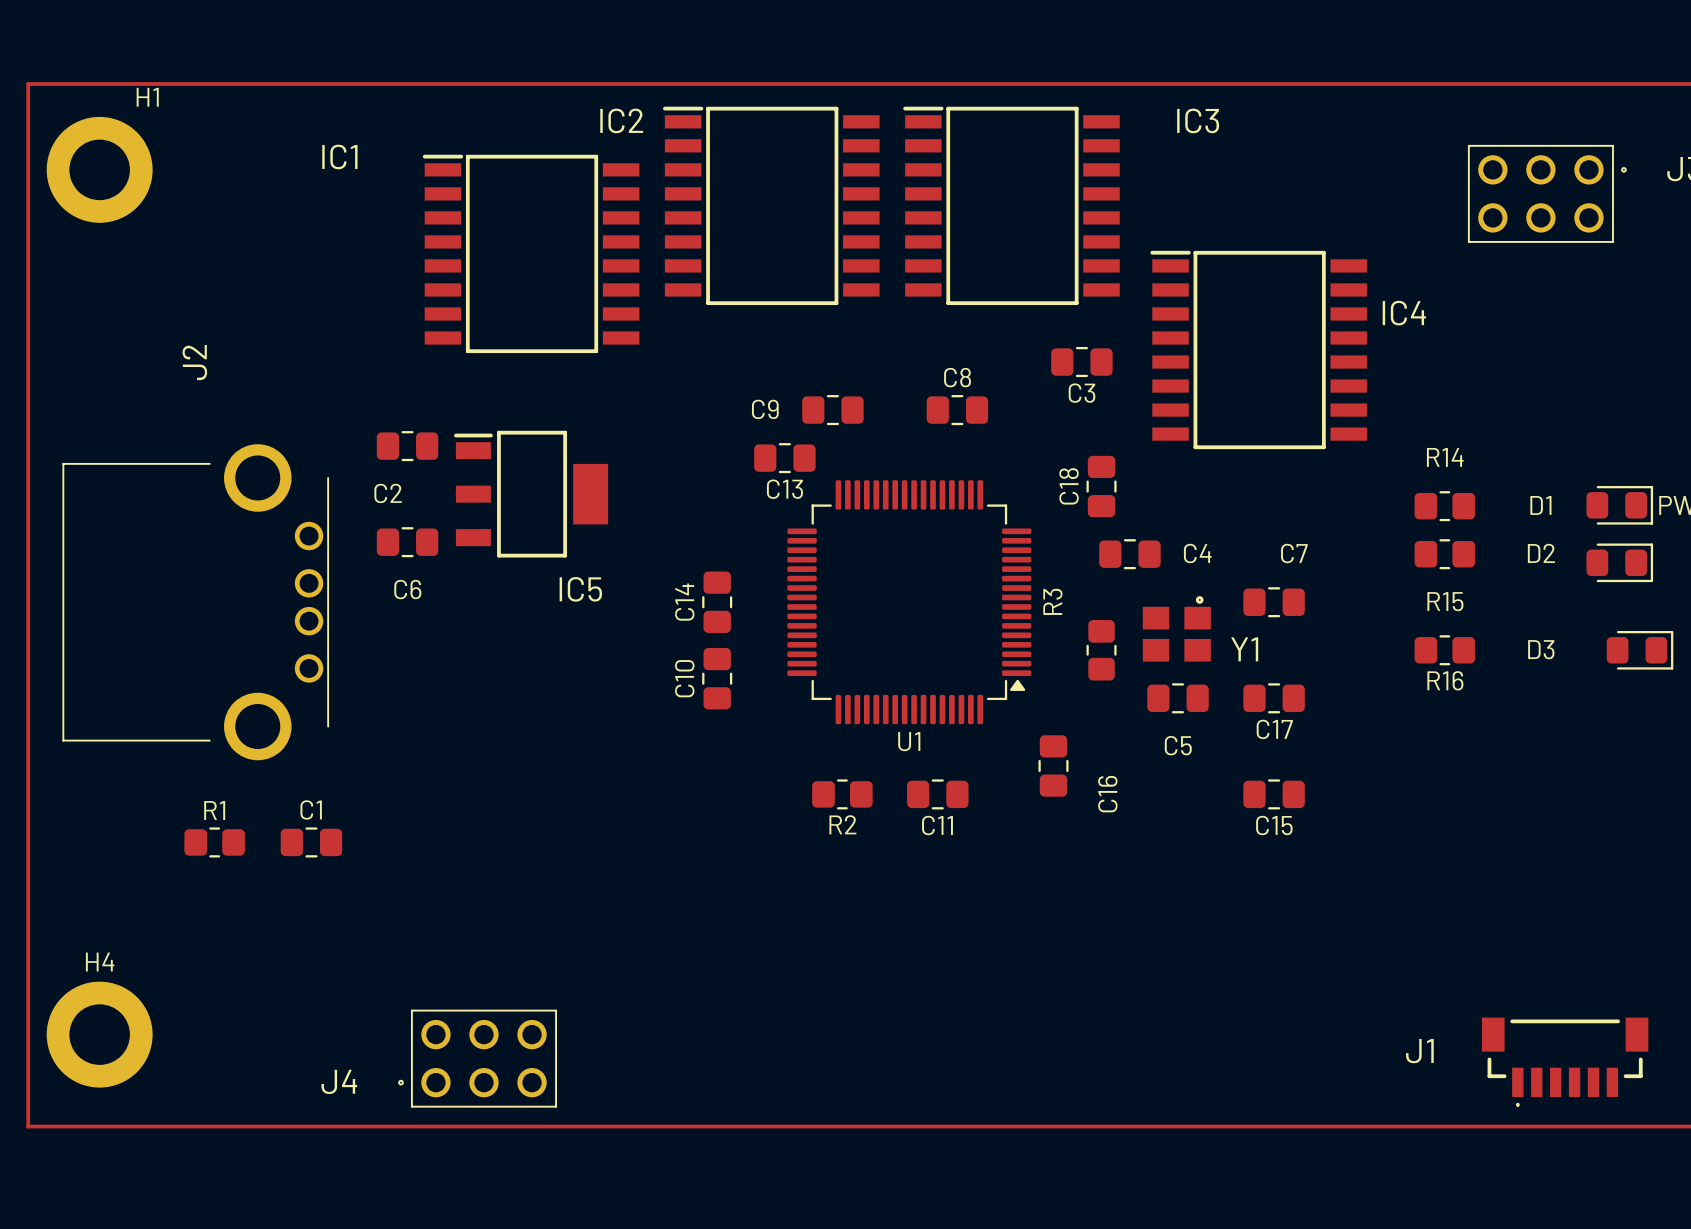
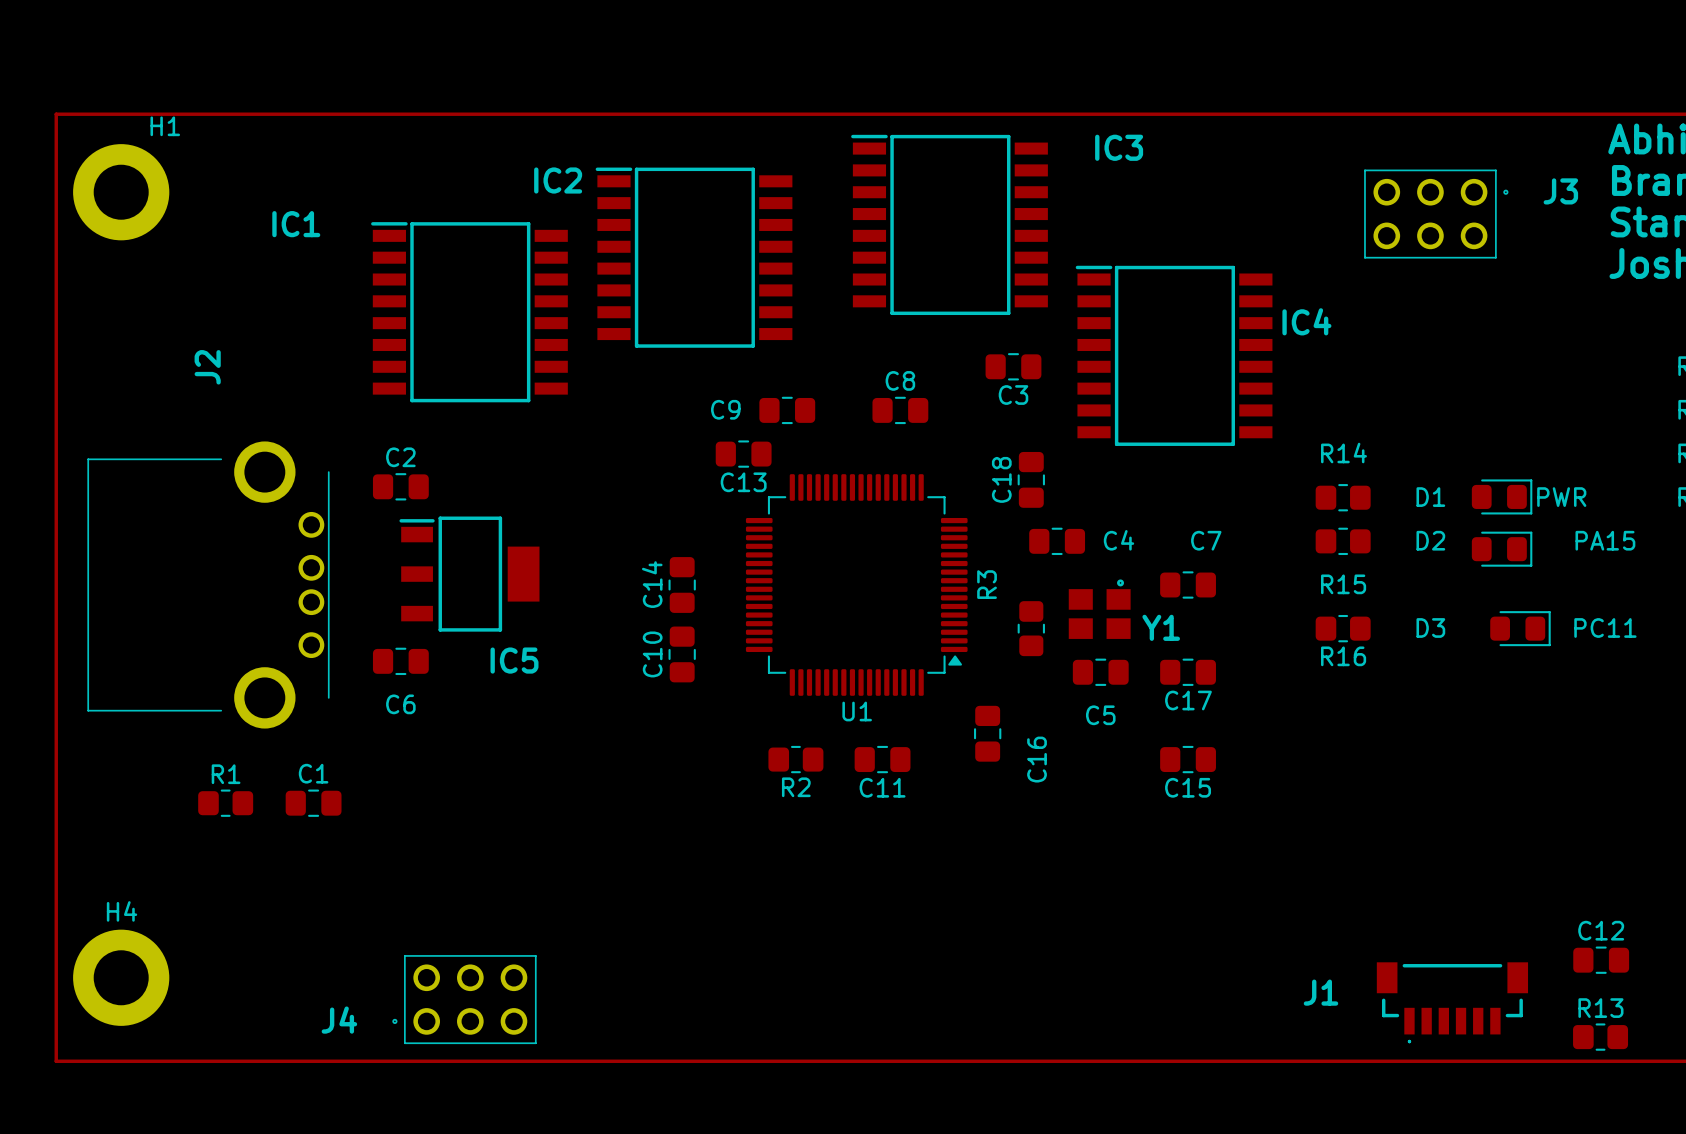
IC2 position: (771, 205) -> (694, 257)
IC1 position: (531, 253) -> (469, 312)
C2 position: (407, 446) -> (400, 486)
C2 name position: C2 (388, 493) -> C2 (400, 457)
IC5 position: (531, 494) -> (469, 574)
C6 position: (407, 542) -> (400, 661)

